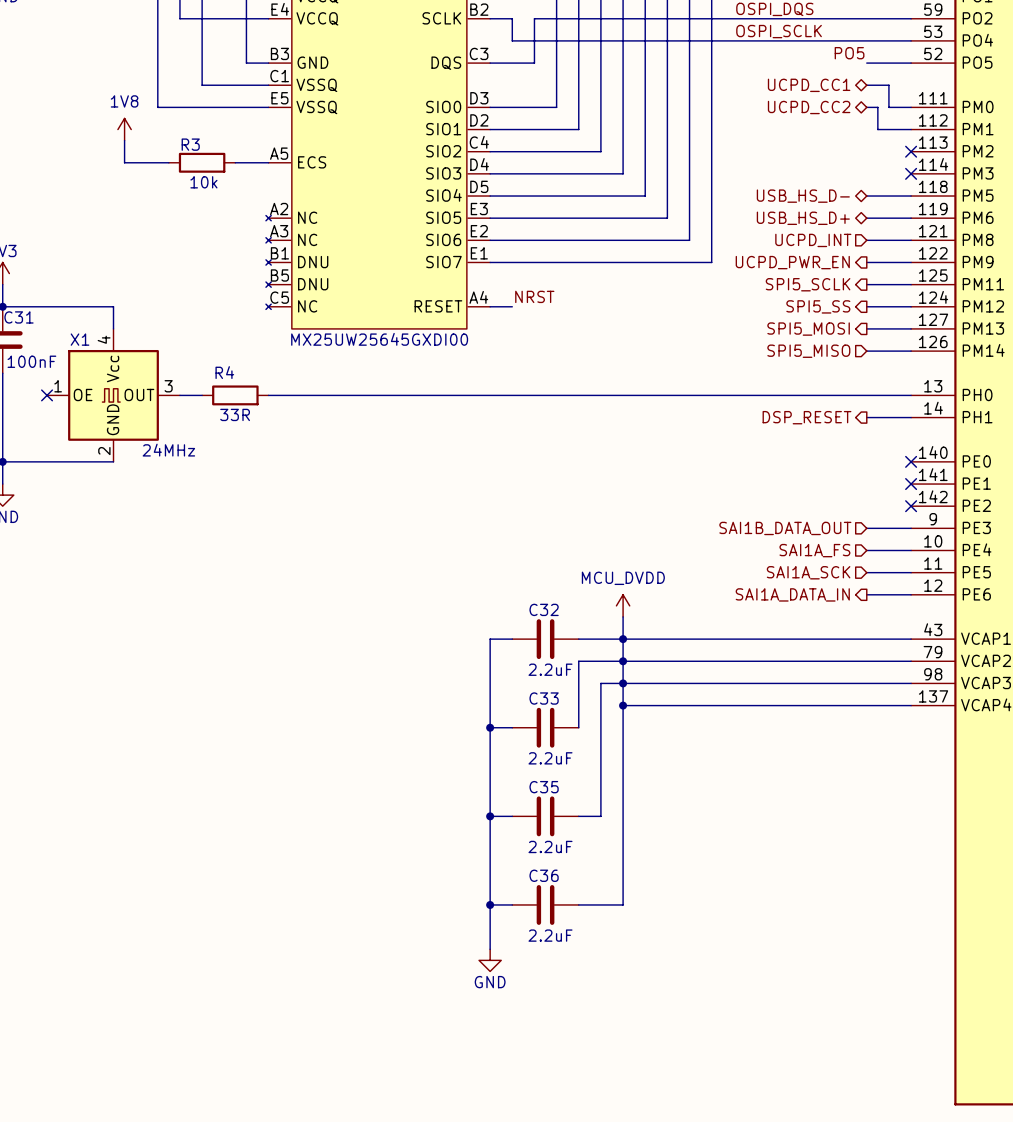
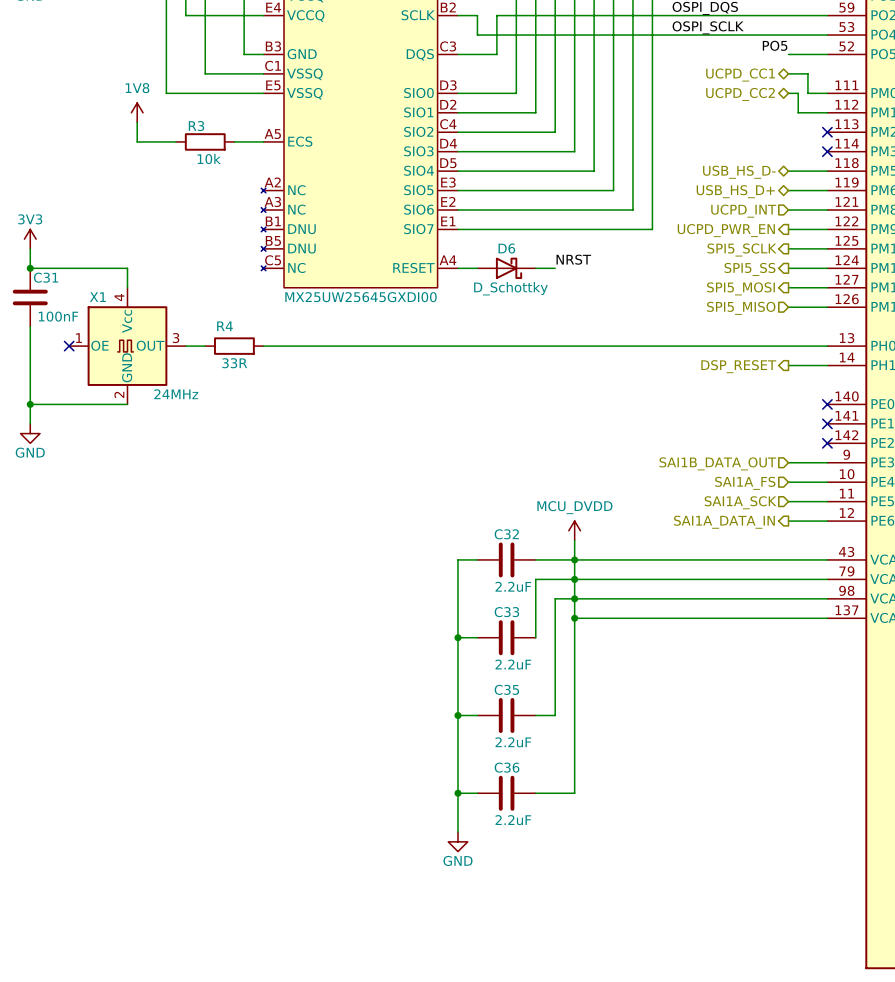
label position: NRST (534, 296) -> NRST (573, 259)
D6: none -> D_Schottky (506, 268)
wire: none -> (535, 268) (555, 268)

